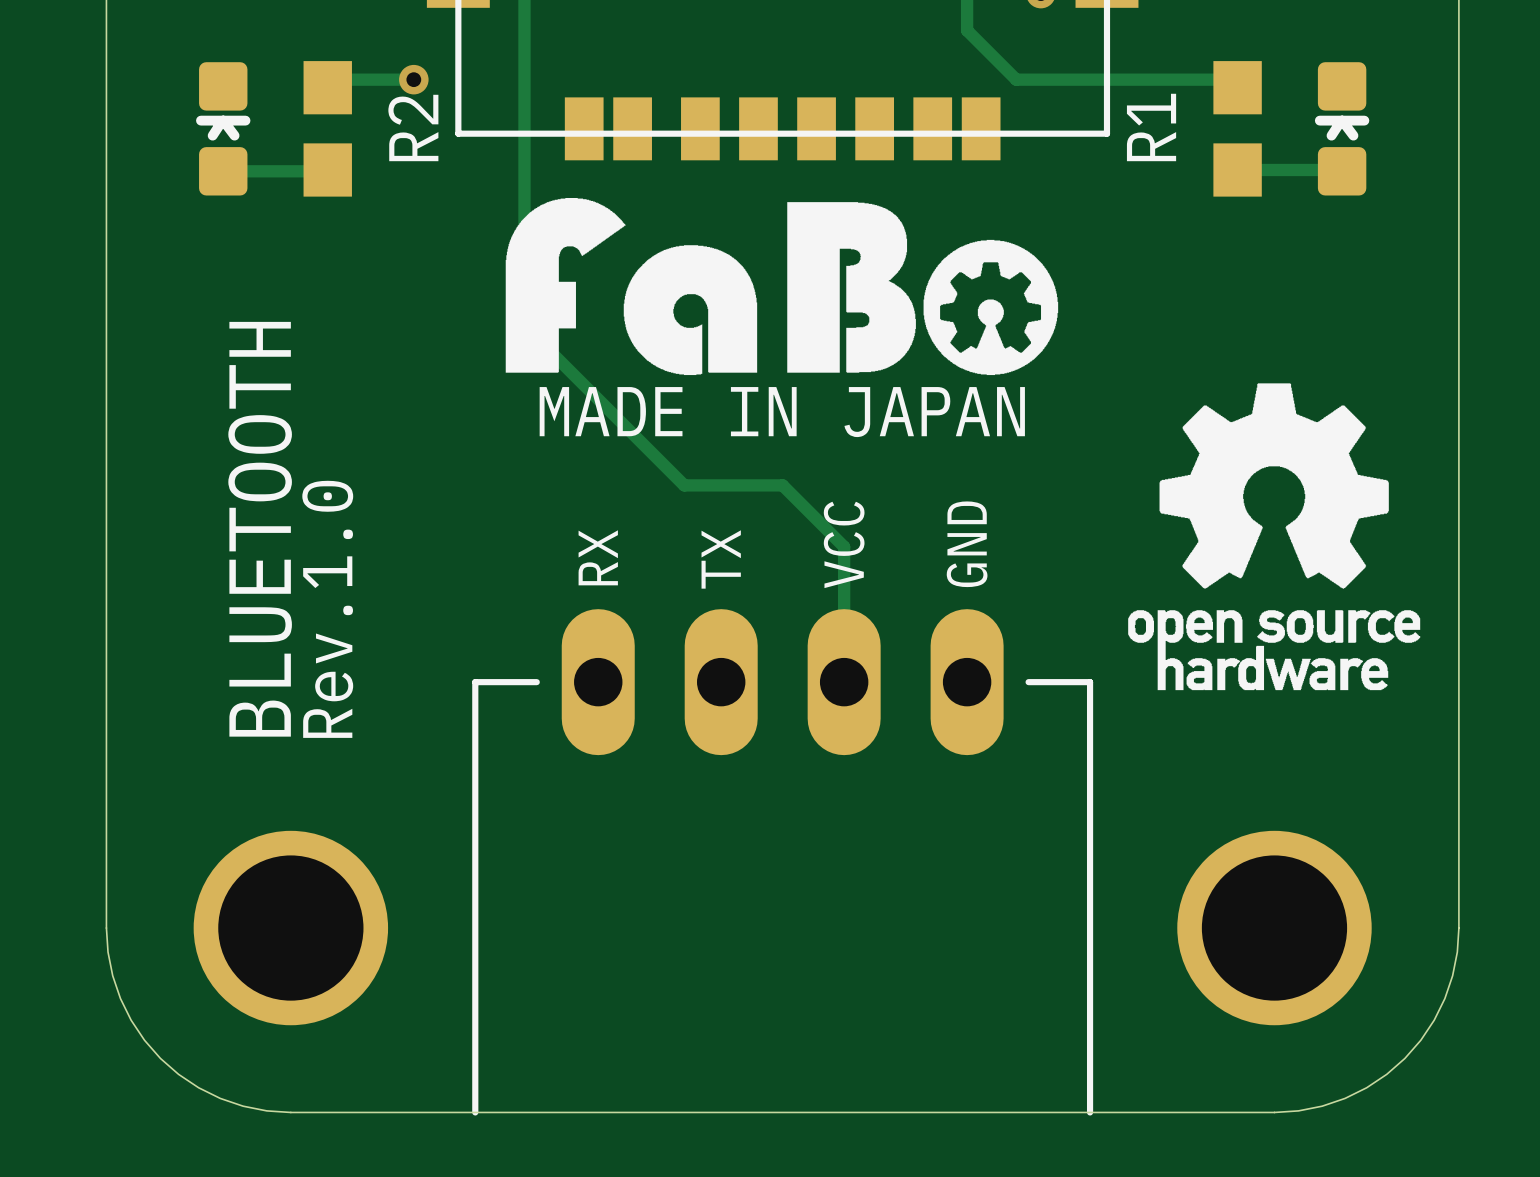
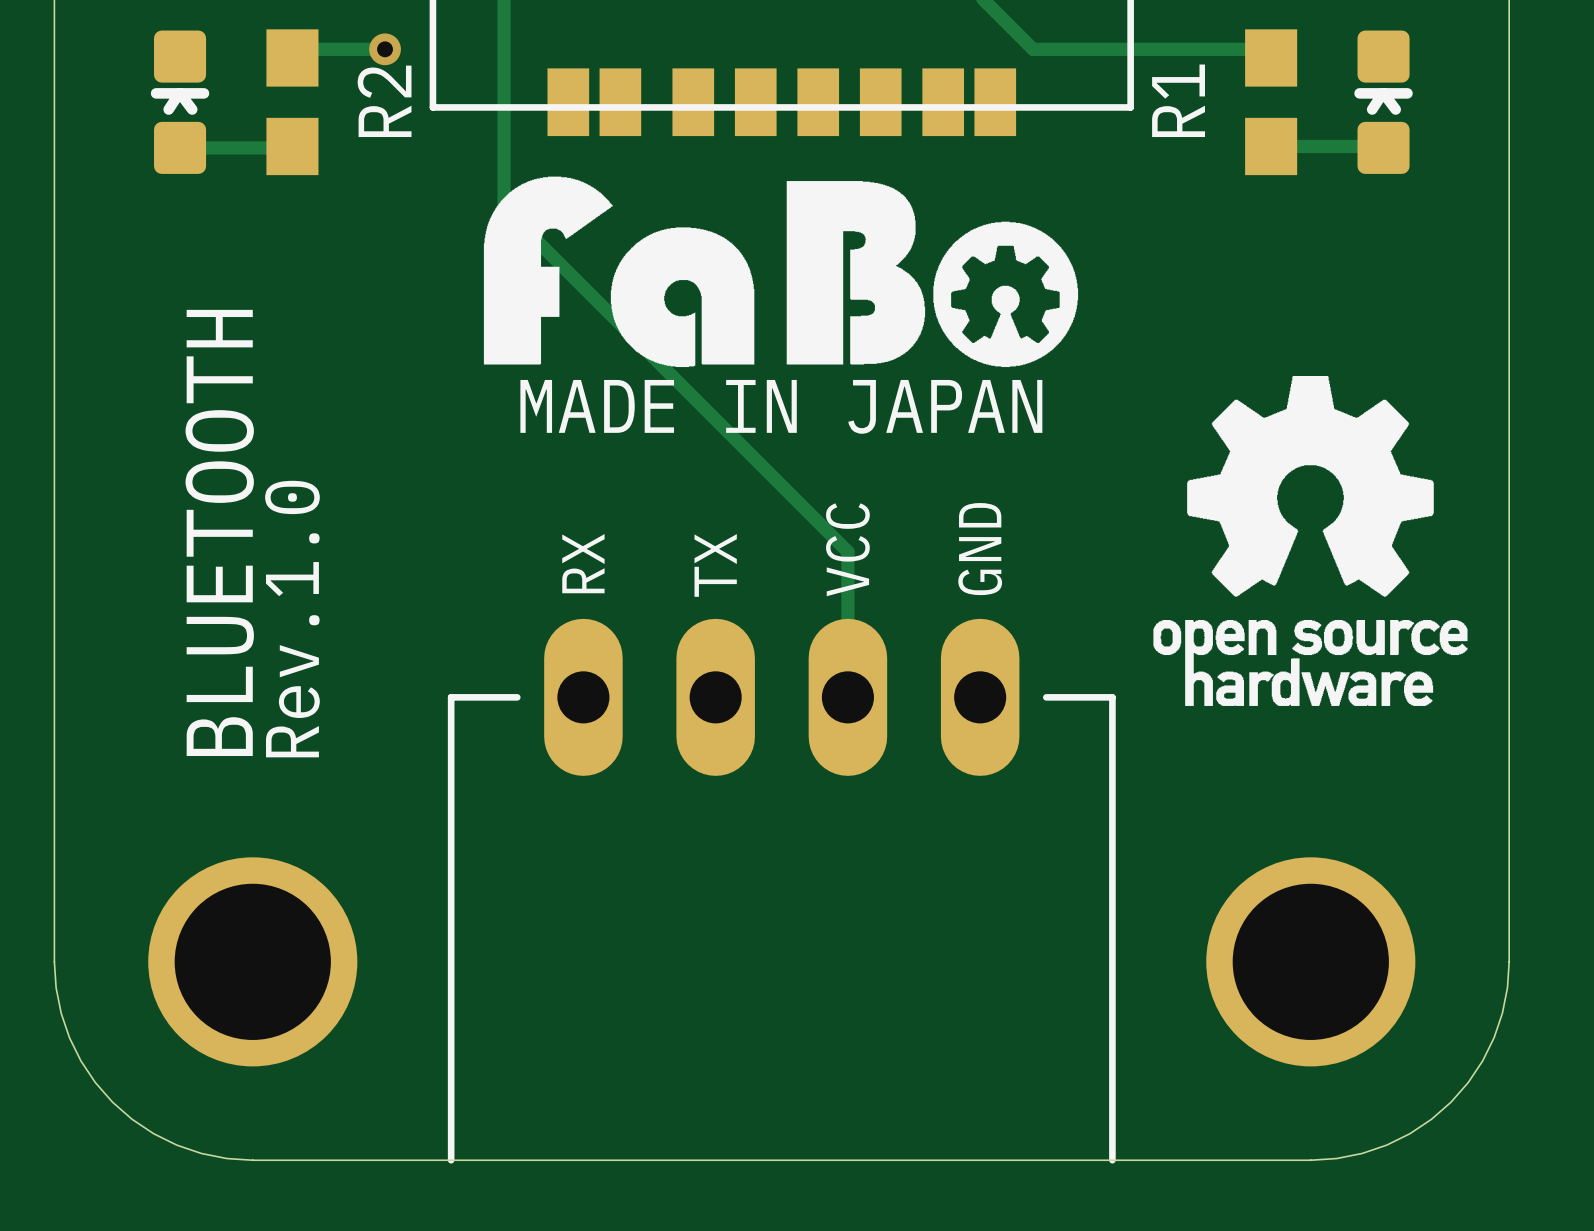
track: (524, 227) (524, 325) (684, 485) (782, 485) -> (504, 208) (781, 485)

